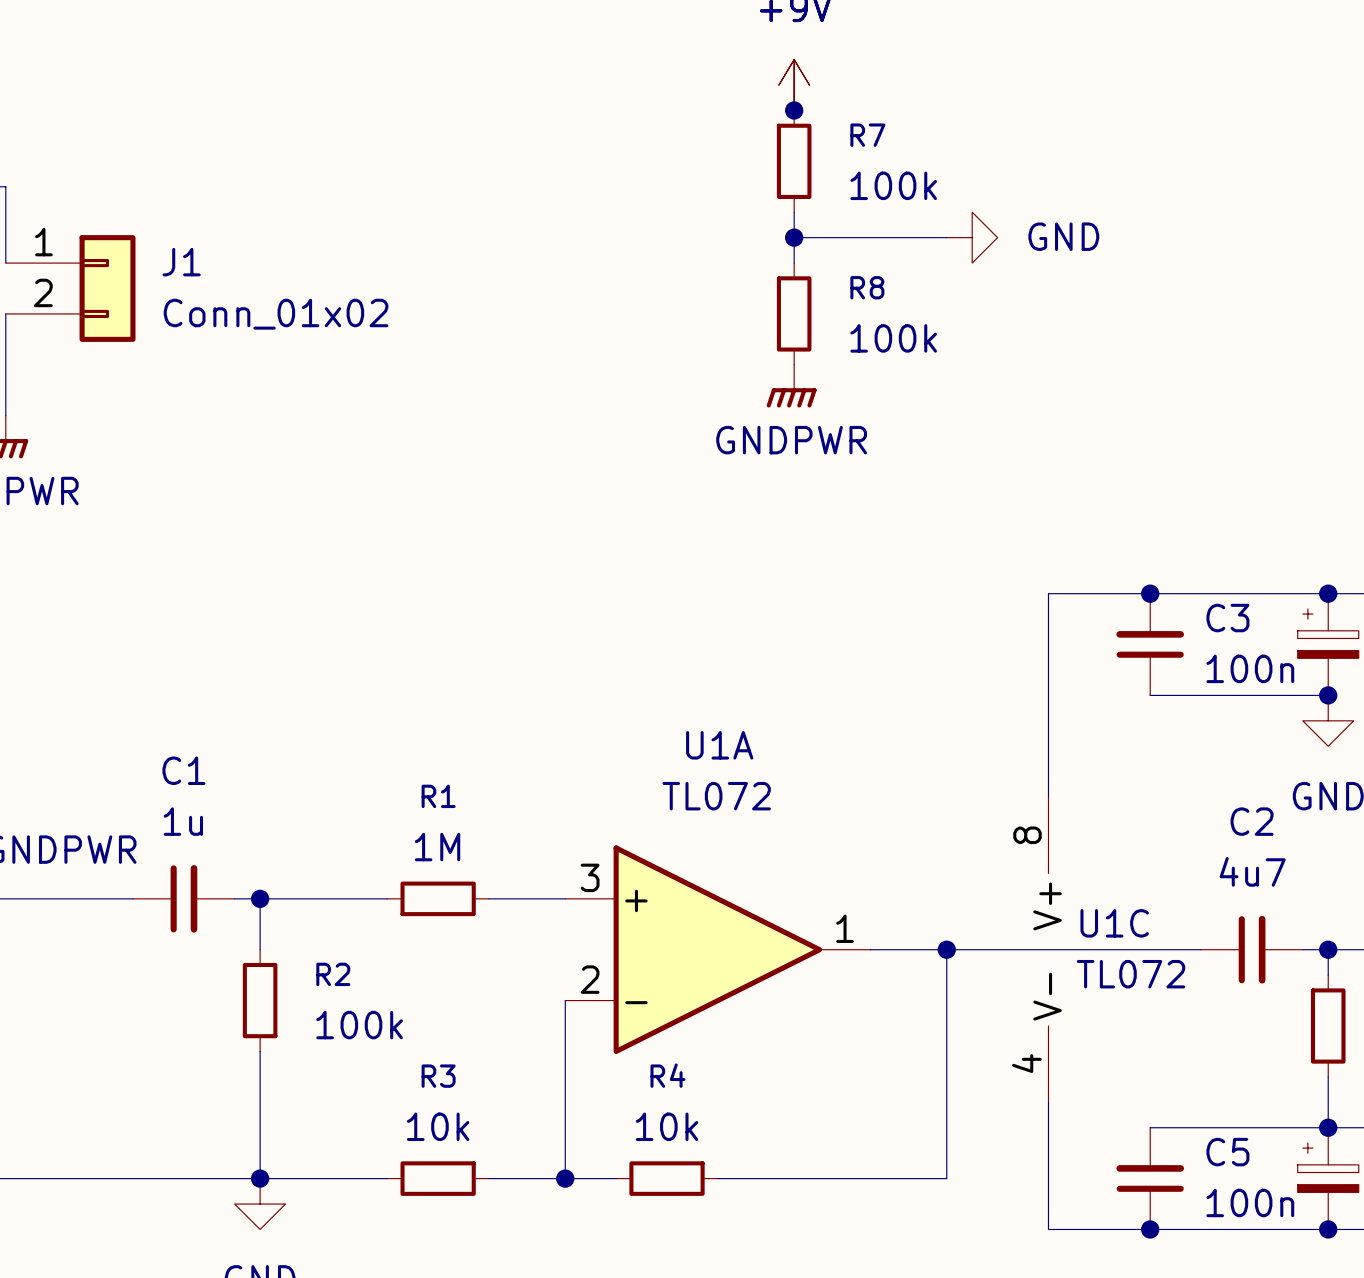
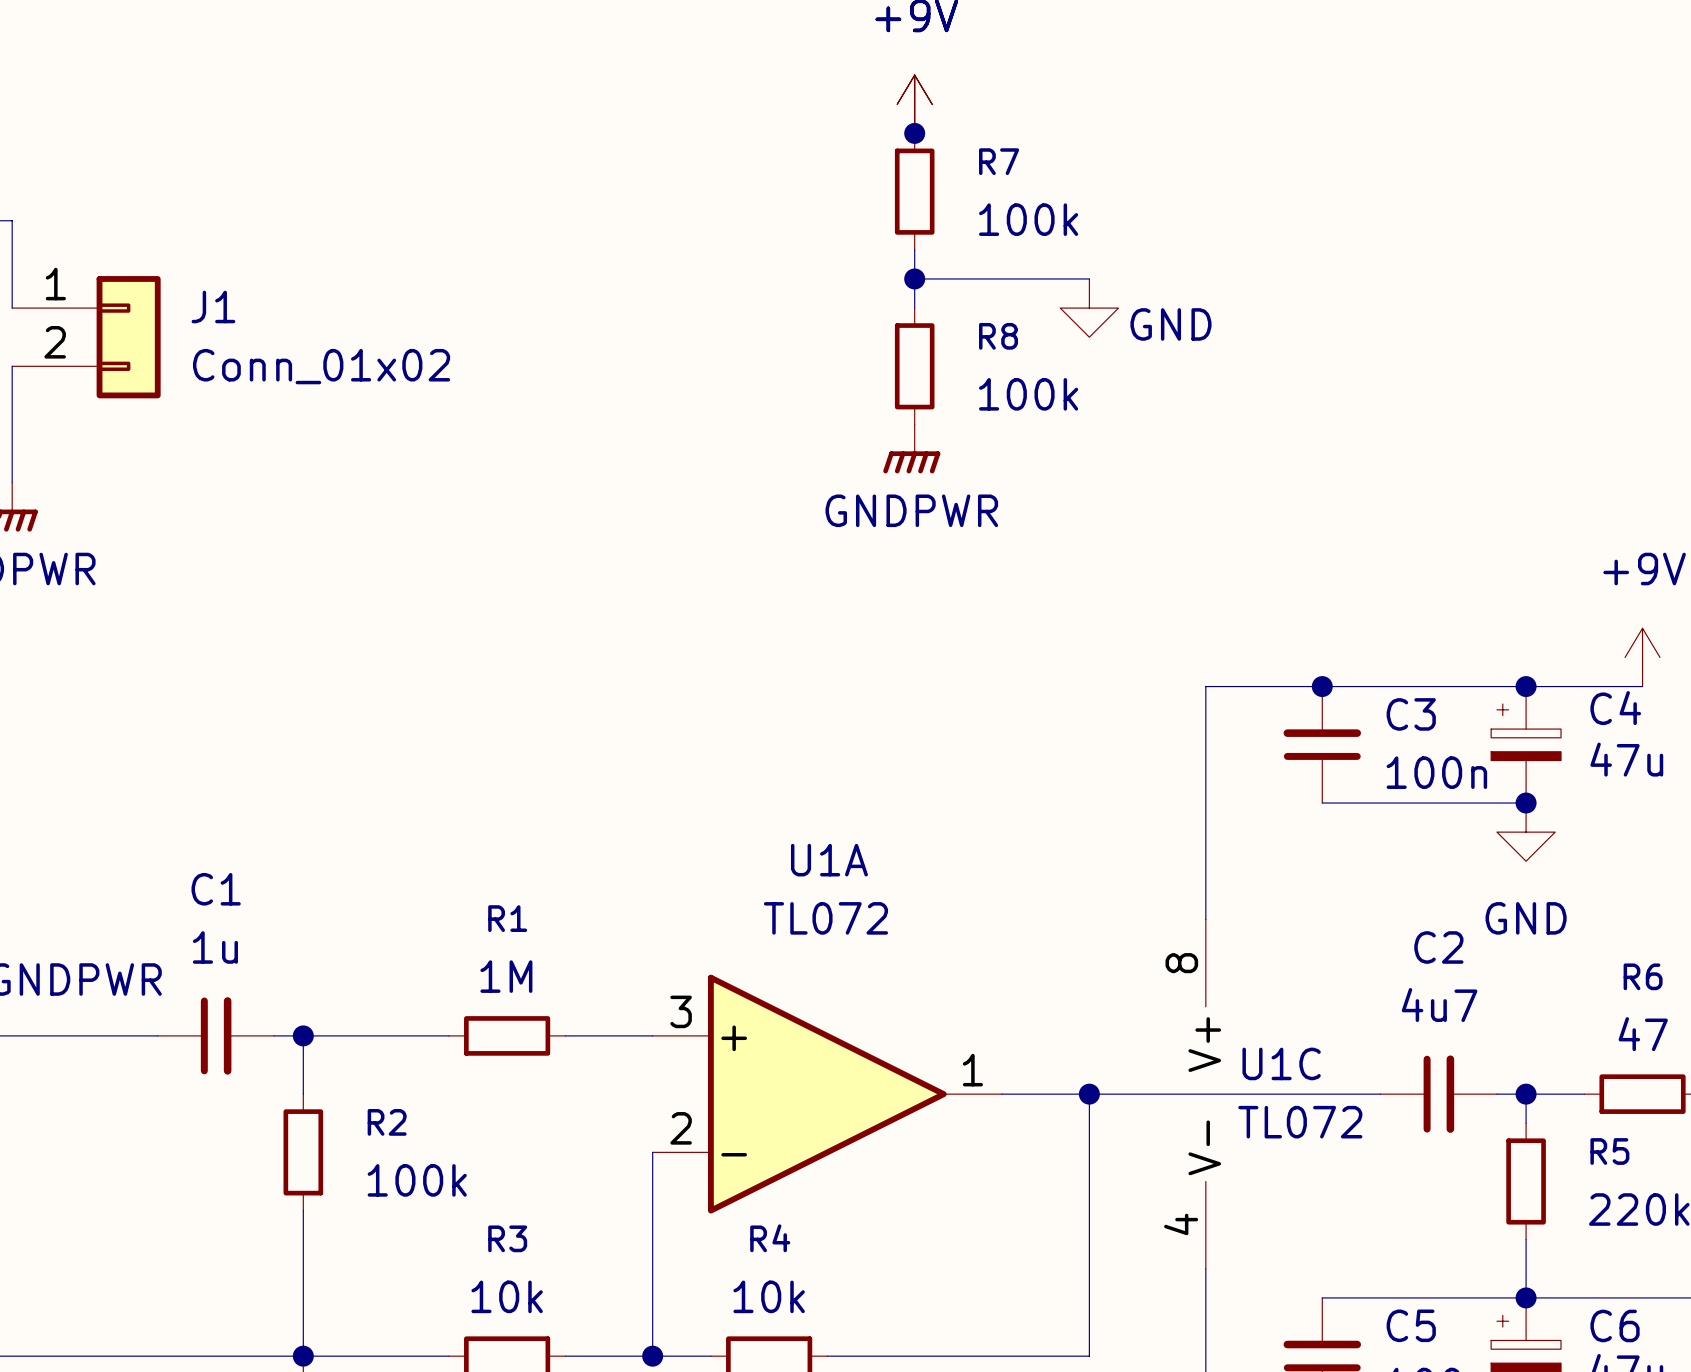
power symbol rotation: 0° (972, 237) -> 90° clockwise (1089, 308)
power symbol position: GND (972, 237) -> GND (1089, 308)

